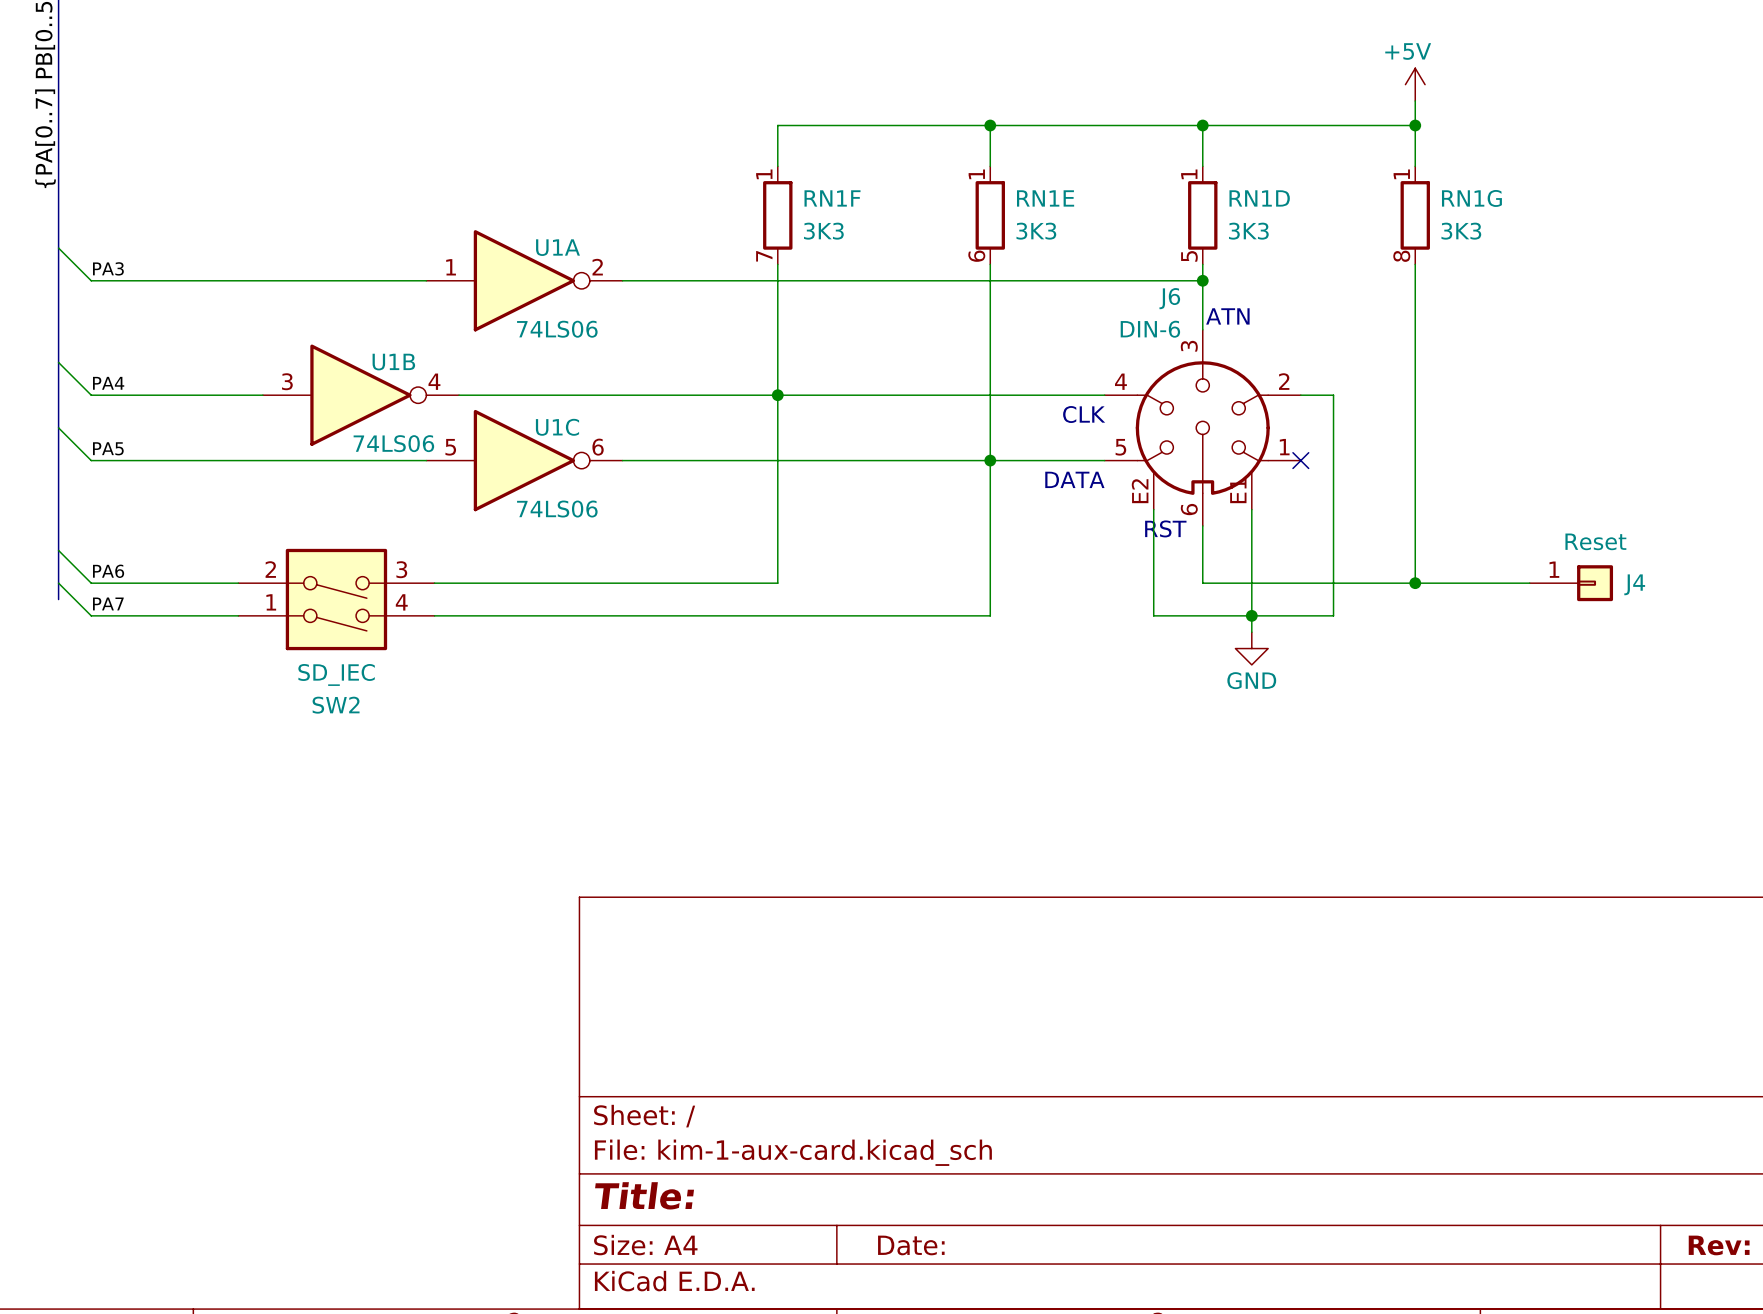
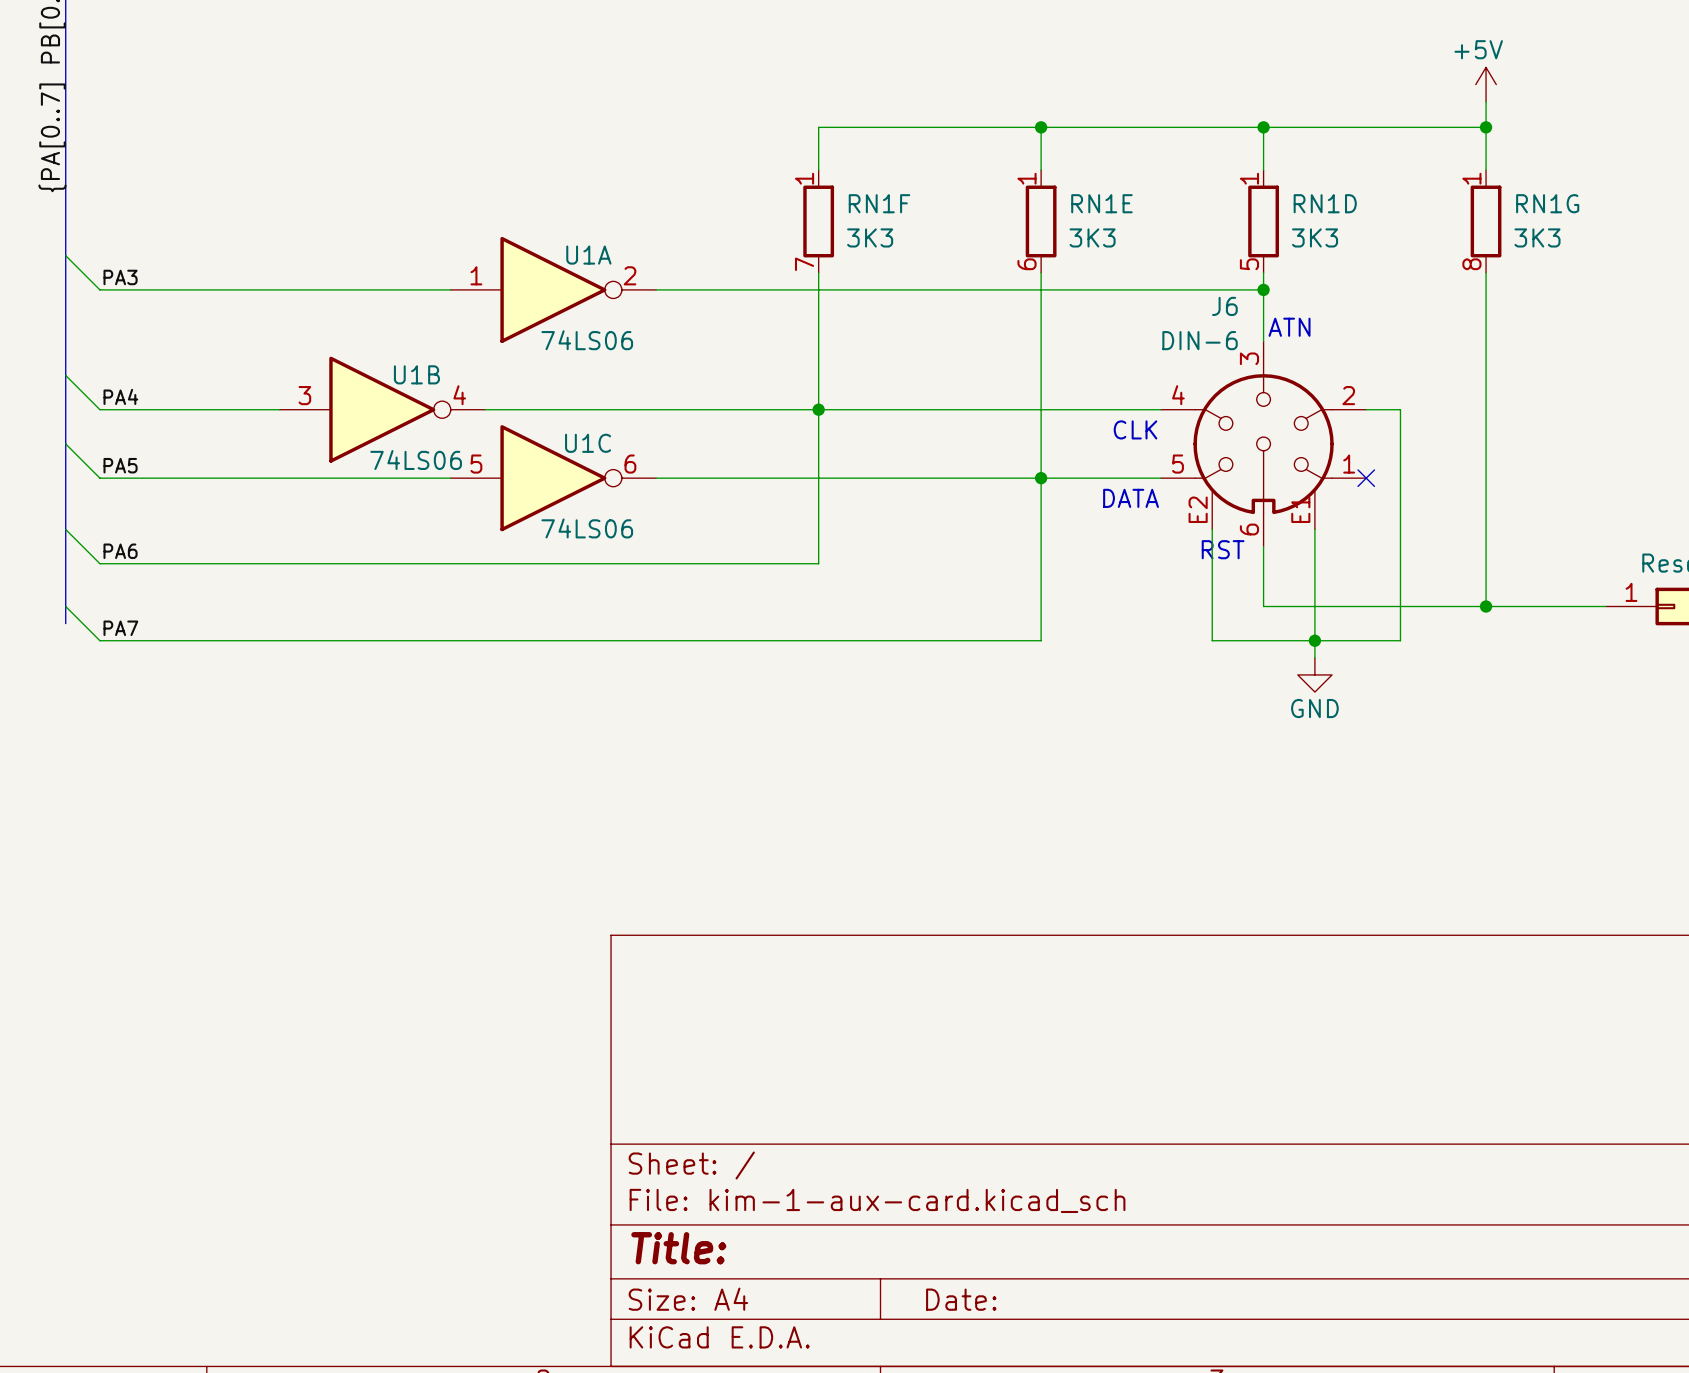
wire: none -> (65, 529) (99, 563)
wire: (777, 542) (777, 583) (434, 583) -> (818, 563) (99, 563)
wire: (58, 550) (91, 583) (238, 583) -> none
label position: PA6 (108, 571) -> PA6 (120, 551)
SW2: SD_IEC (336, 599) -> none

